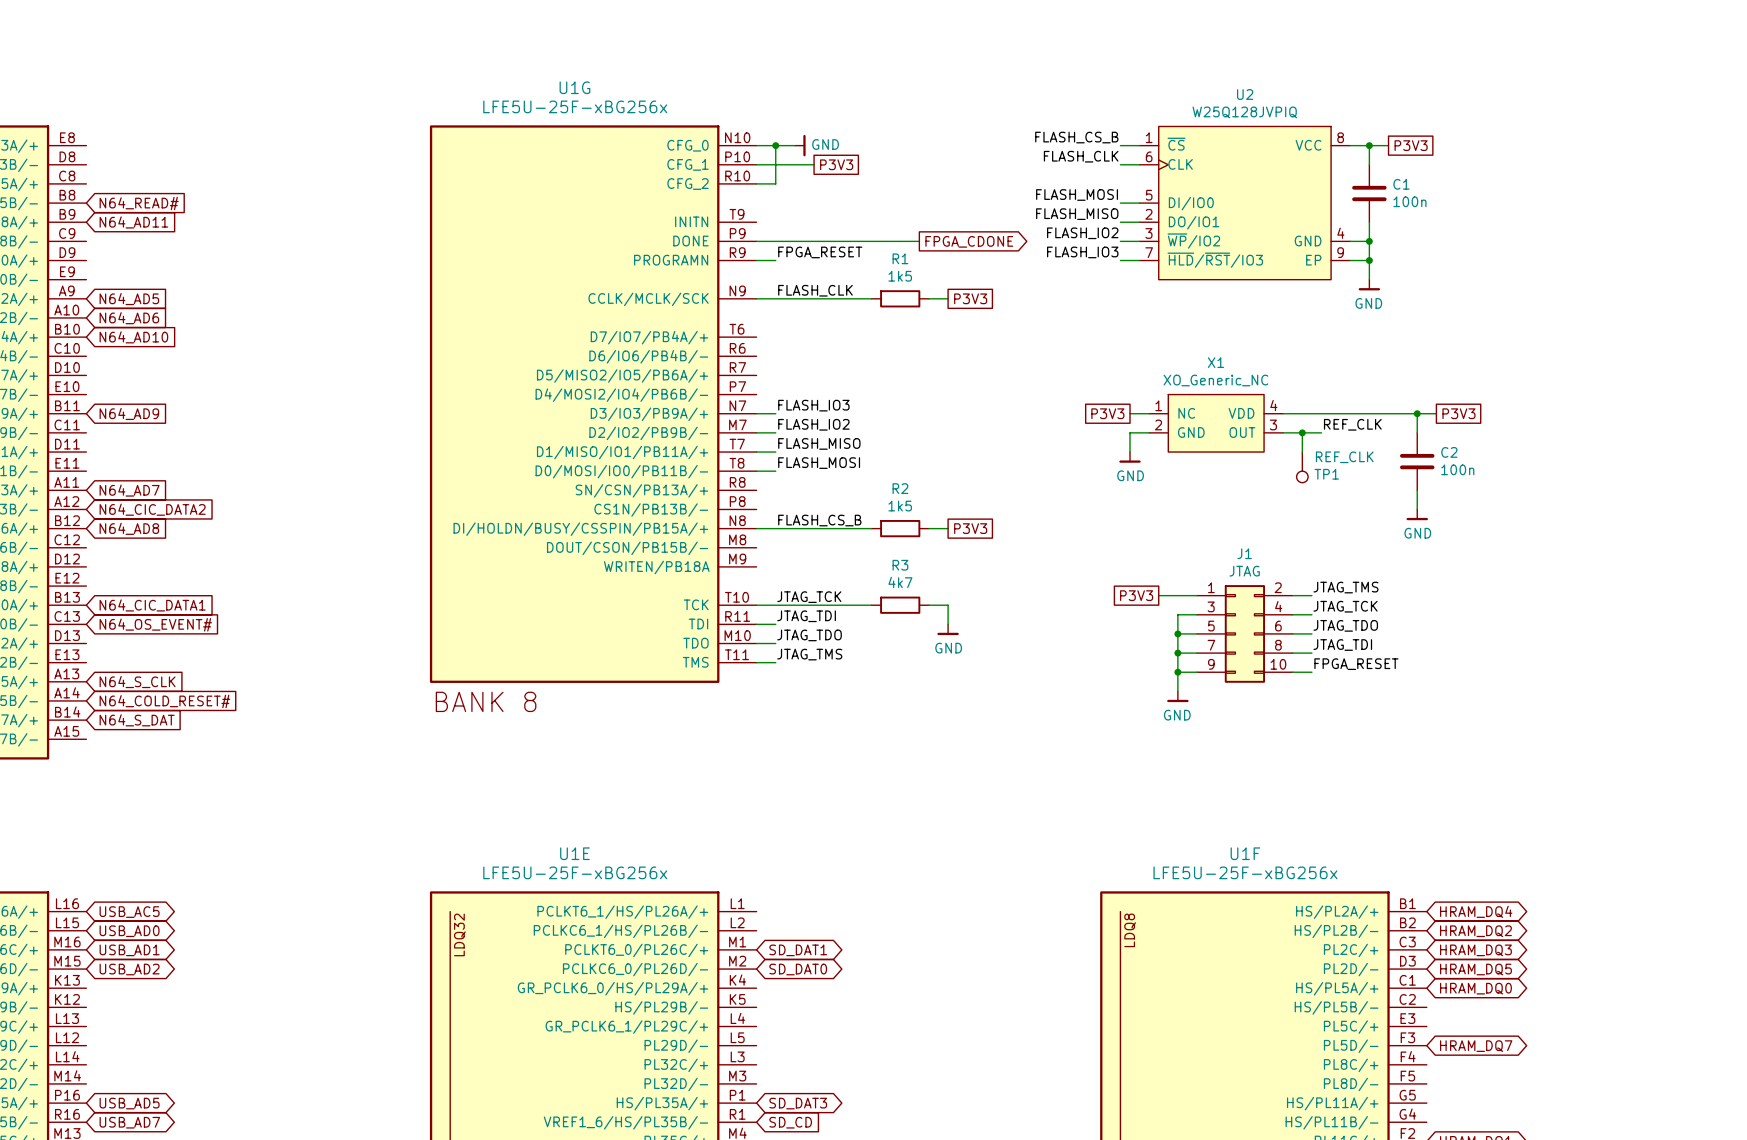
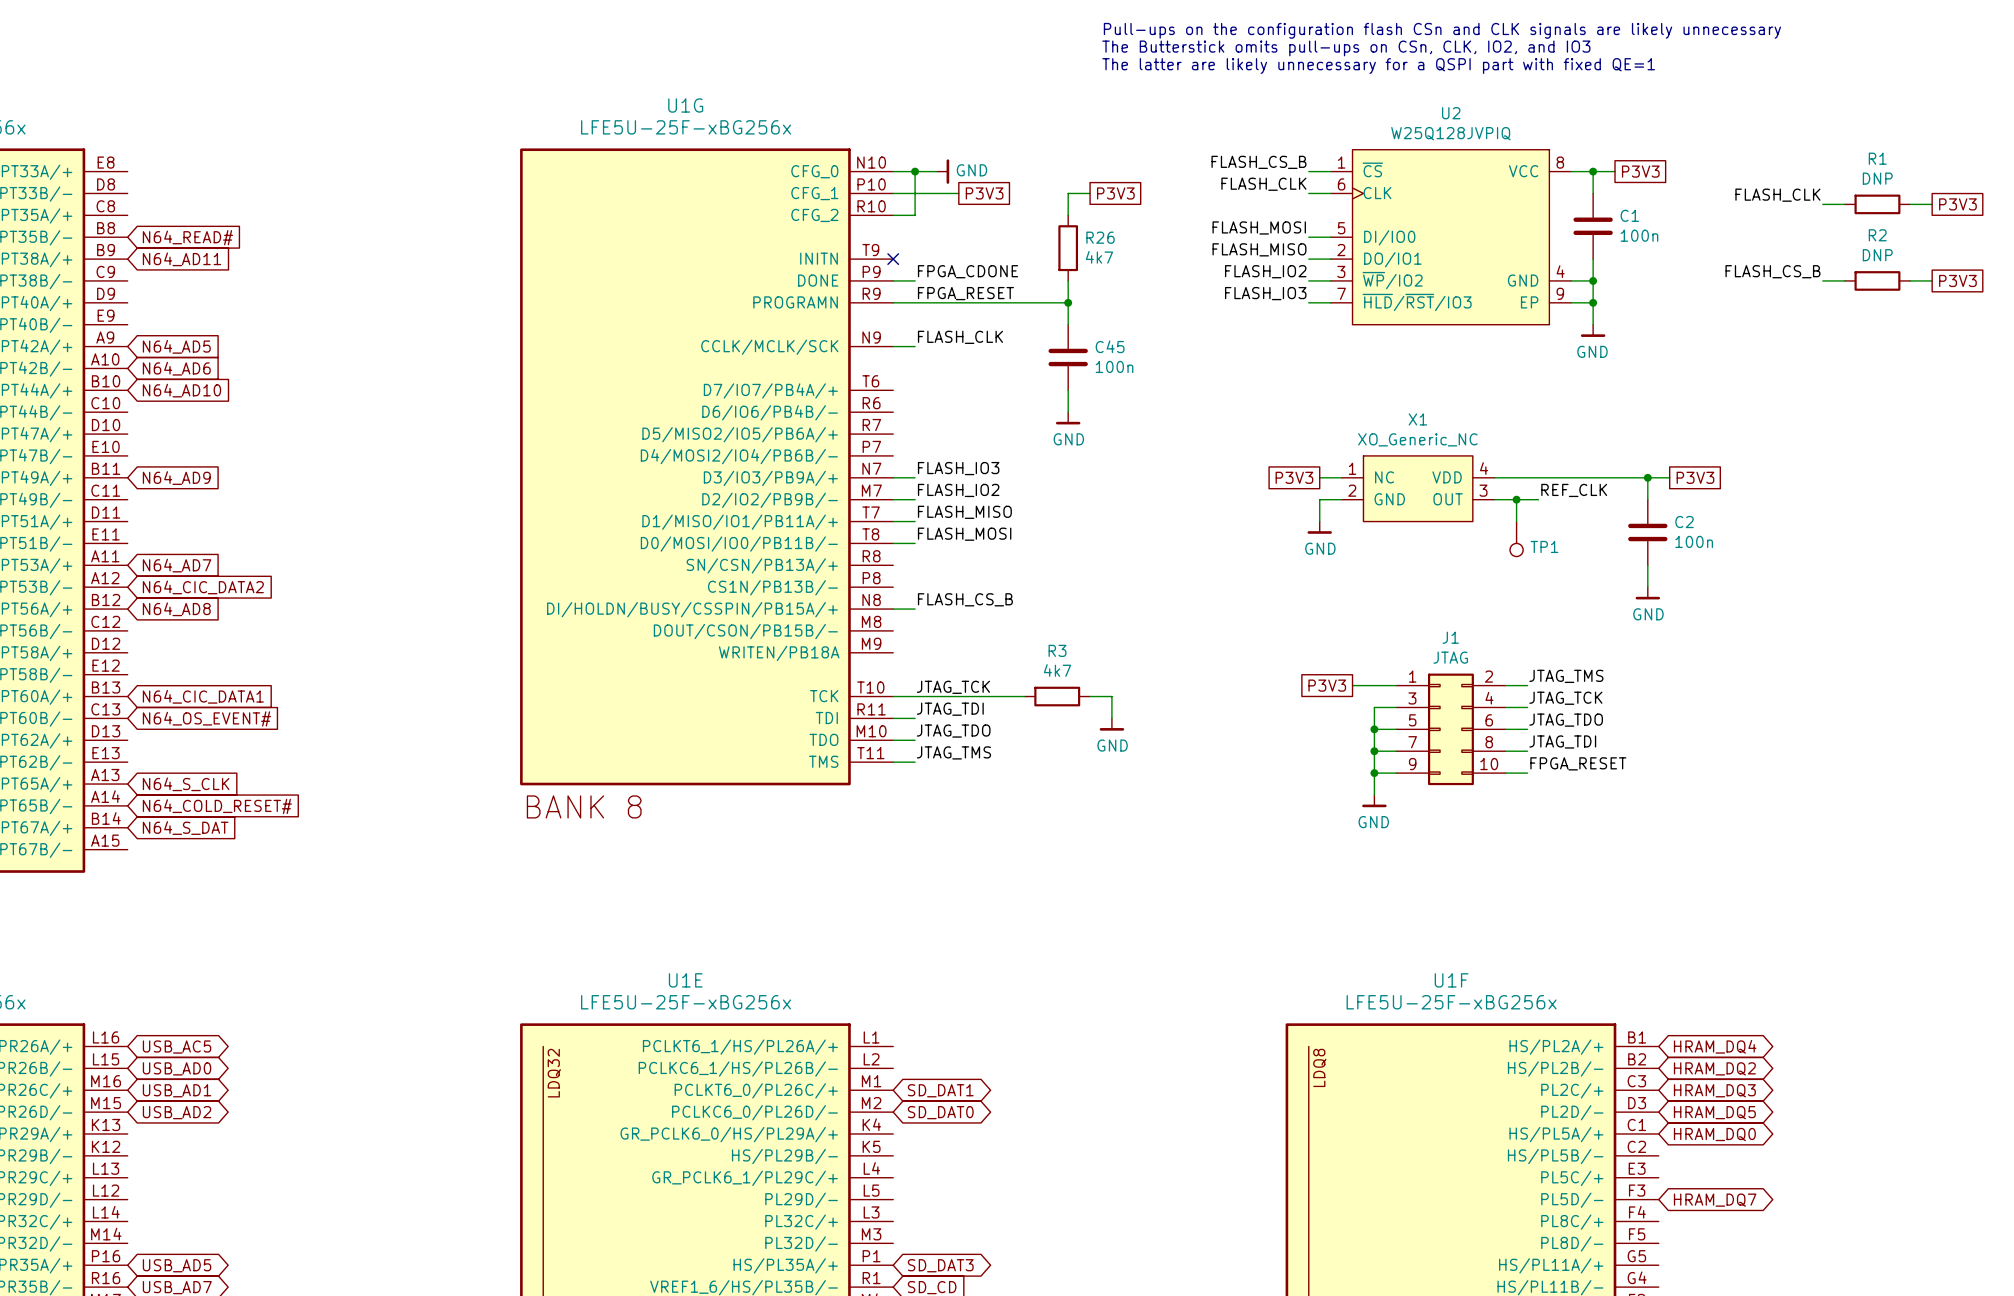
text: none -> Pull-ups on the configuration flash CSn and CLK signals are likely unnecessary (1442, 30)
text: none -> The Butterstick omits pull-ups on CSn, CLK, IO2, and IO3 (1346, 48)
text: none -> The latter are likely unnecessary for a QSPI part with fixed QE=1 (1378, 66)
wire: none -> (1090, 193) (1068, 193) (1068, 215)
label: none -> FLASH_CLK (1777, 195)
wire: none -> (1822, 204) (1844, 204)
wire: none -> (1910, 204) (1932, 204)
global label: none -> P3V3 (1957, 204)
R26: none -> 4k7 (1068, 248)
no-connect mark: none -> (893, 259)
label: none -> FPGA_CDONE (968, 271)
label: none -> FLASH_CS_B (1772, 271)
wire: (775, 241) (919, 241) -> none
wire: none -> (1068, 280) (1068, 324)
global label: FPGA_CDONE (969, 241) -> none
wire: none -> (1822, 280) (1844, 280)
wire: none -> (1910, 280) (1932, 280)
global label: none -> P3V3 (1957, 280)
wire: none -> (915, 302) (1068, 302)
junction: none -> (1068, 302)
R1 value: 1k5 (900, 276) -> DNP (1877, 178)
wire: (775, 298) (871, 298) -> none
R1 position: (900, 298) -> (1877, 204)
wire: (928, 298) (948, 298) -> none
global label position: P3V3 (970, 298) -> P3V3 (1115, 193)
C45: none -> 100n (1068, 357)
wire: none -> (1068, 390) (1068, 412)
power symbol: none -> GND (1068, 418)
TP1 value: REF_CLK (1344, 457) -> none
R2 value: 1k5 (900, 506) -> DNP (1877, 255)
wire: (775, 528) (871, 528) -> none
R2 position: (900, 528) -> (1877, 280)
wire: (928, 528) (948, 528) -> none
global label: P3V3 (970, 528) -> none

